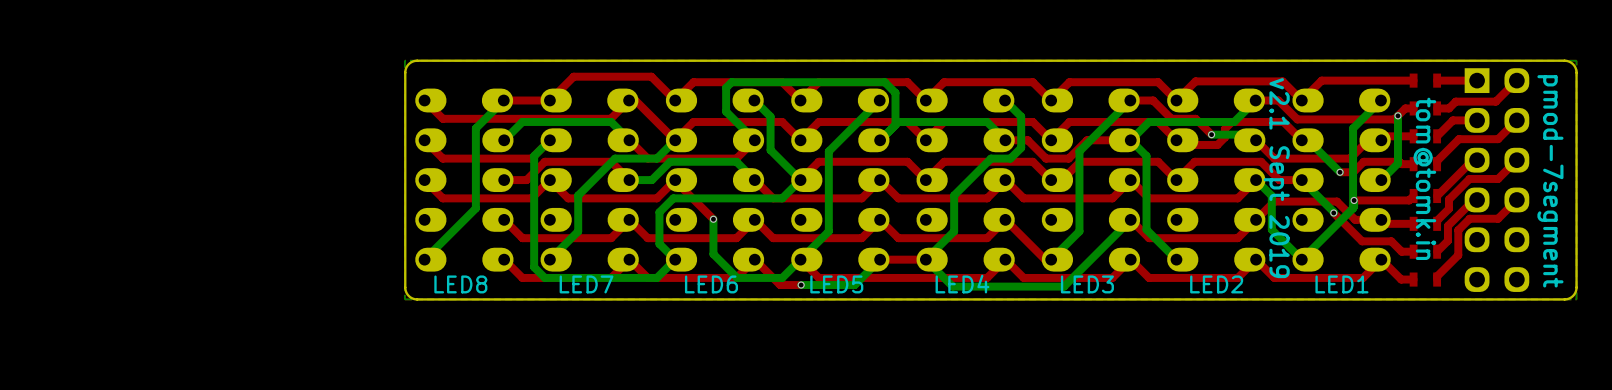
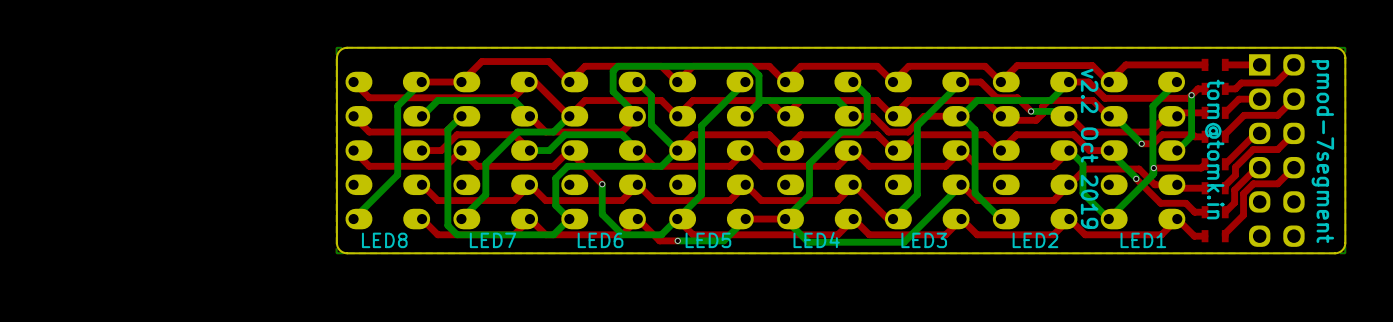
text: v2.1 Sept 2019 (1276, 178) -> v2.2 Oct 2019 (1089, 148)

